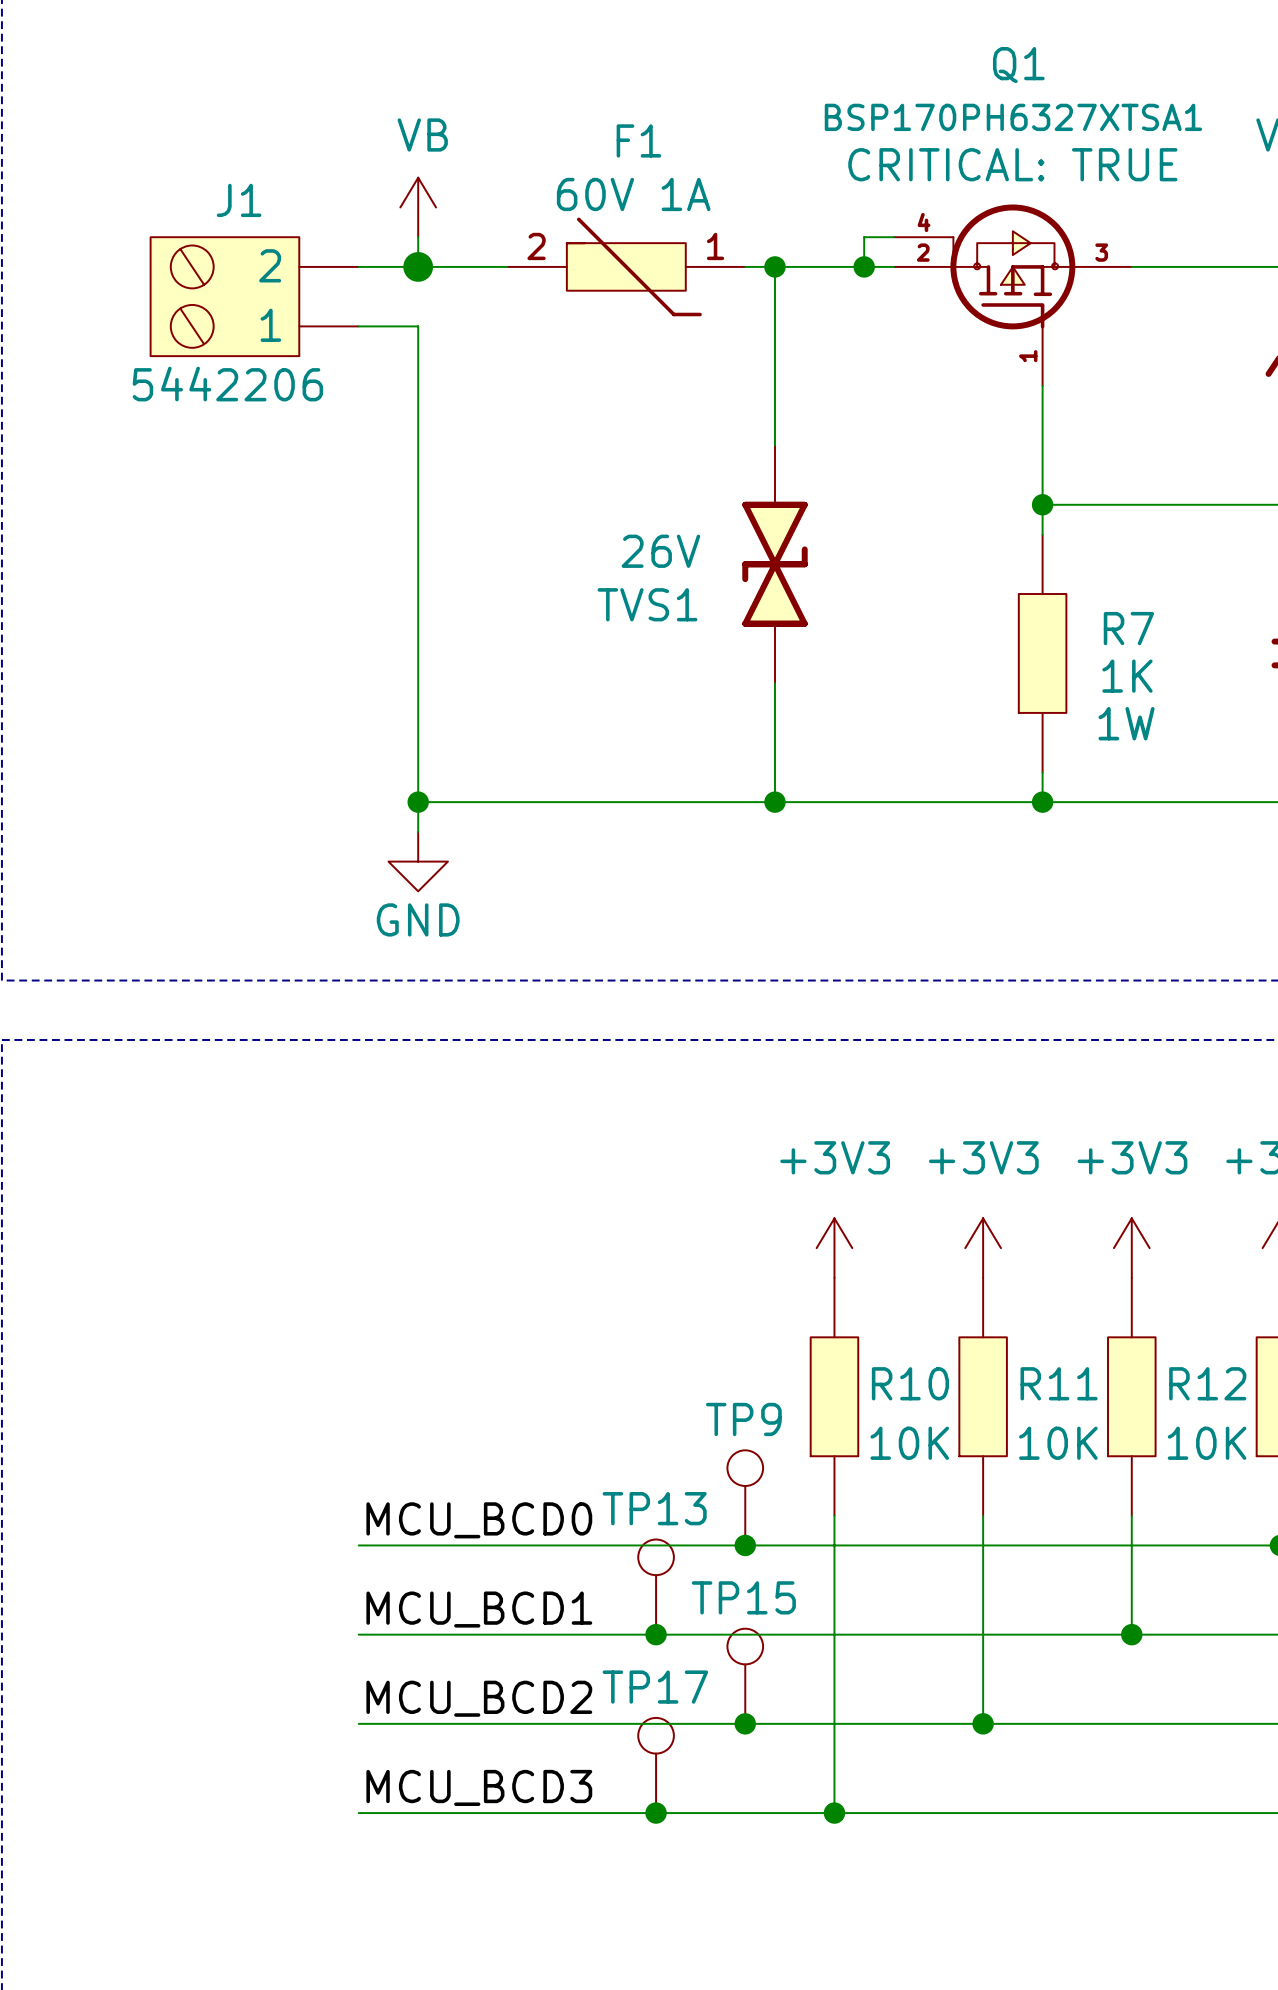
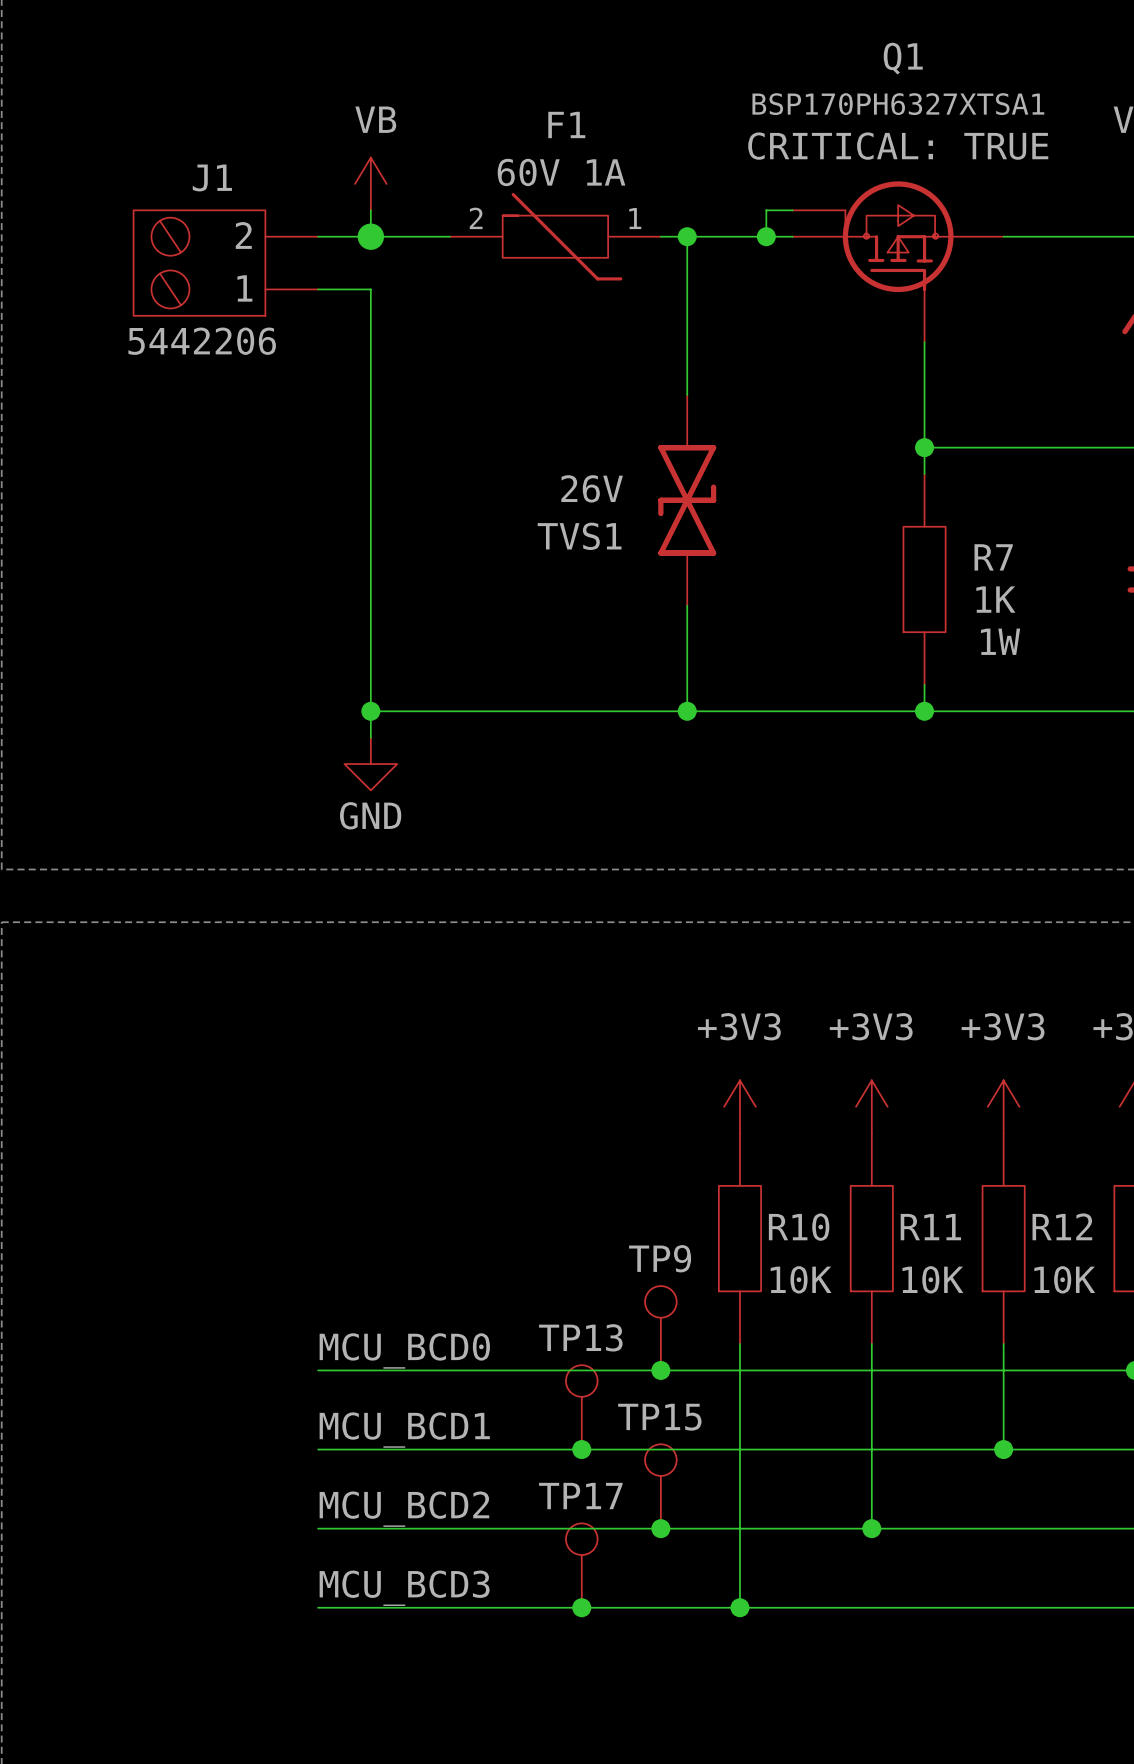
Q1 pin number: 4 (924, 222) -> none
Q1 pin number: 2 (923, 252) -> none
Q1 pin number: 3 (1101, 252) -> none
Q1 pin number: 1 (1028, 356) -> none

